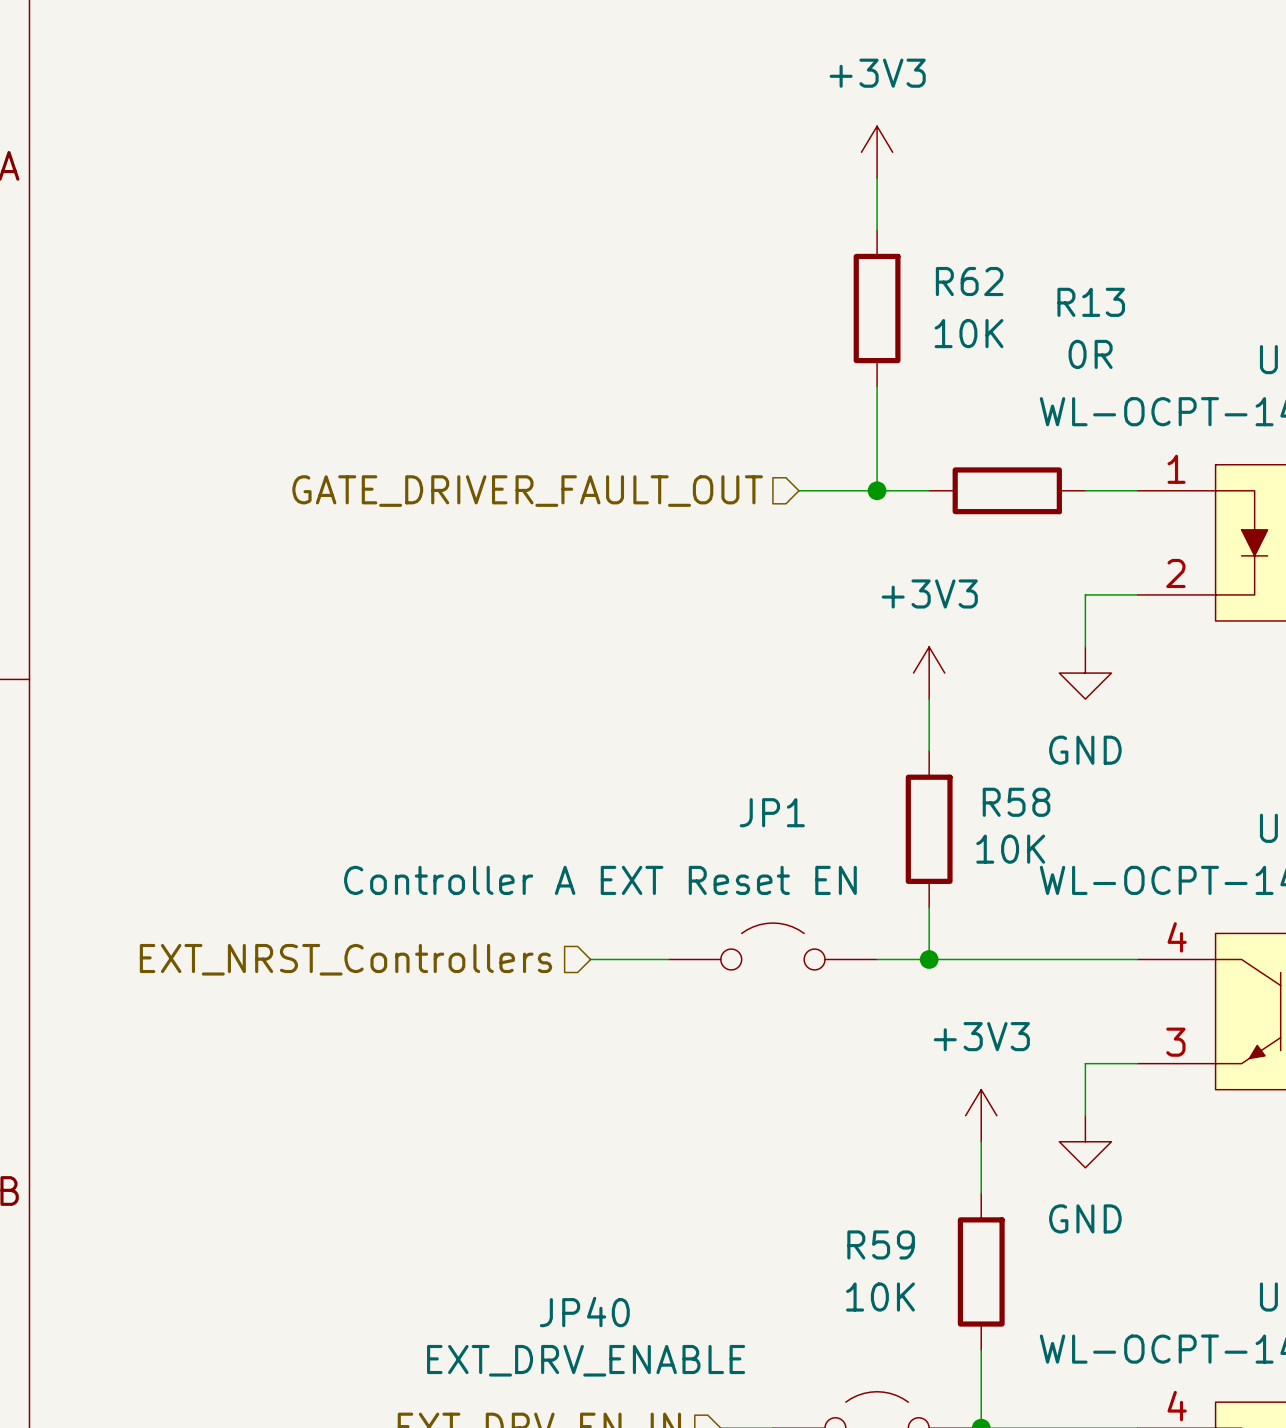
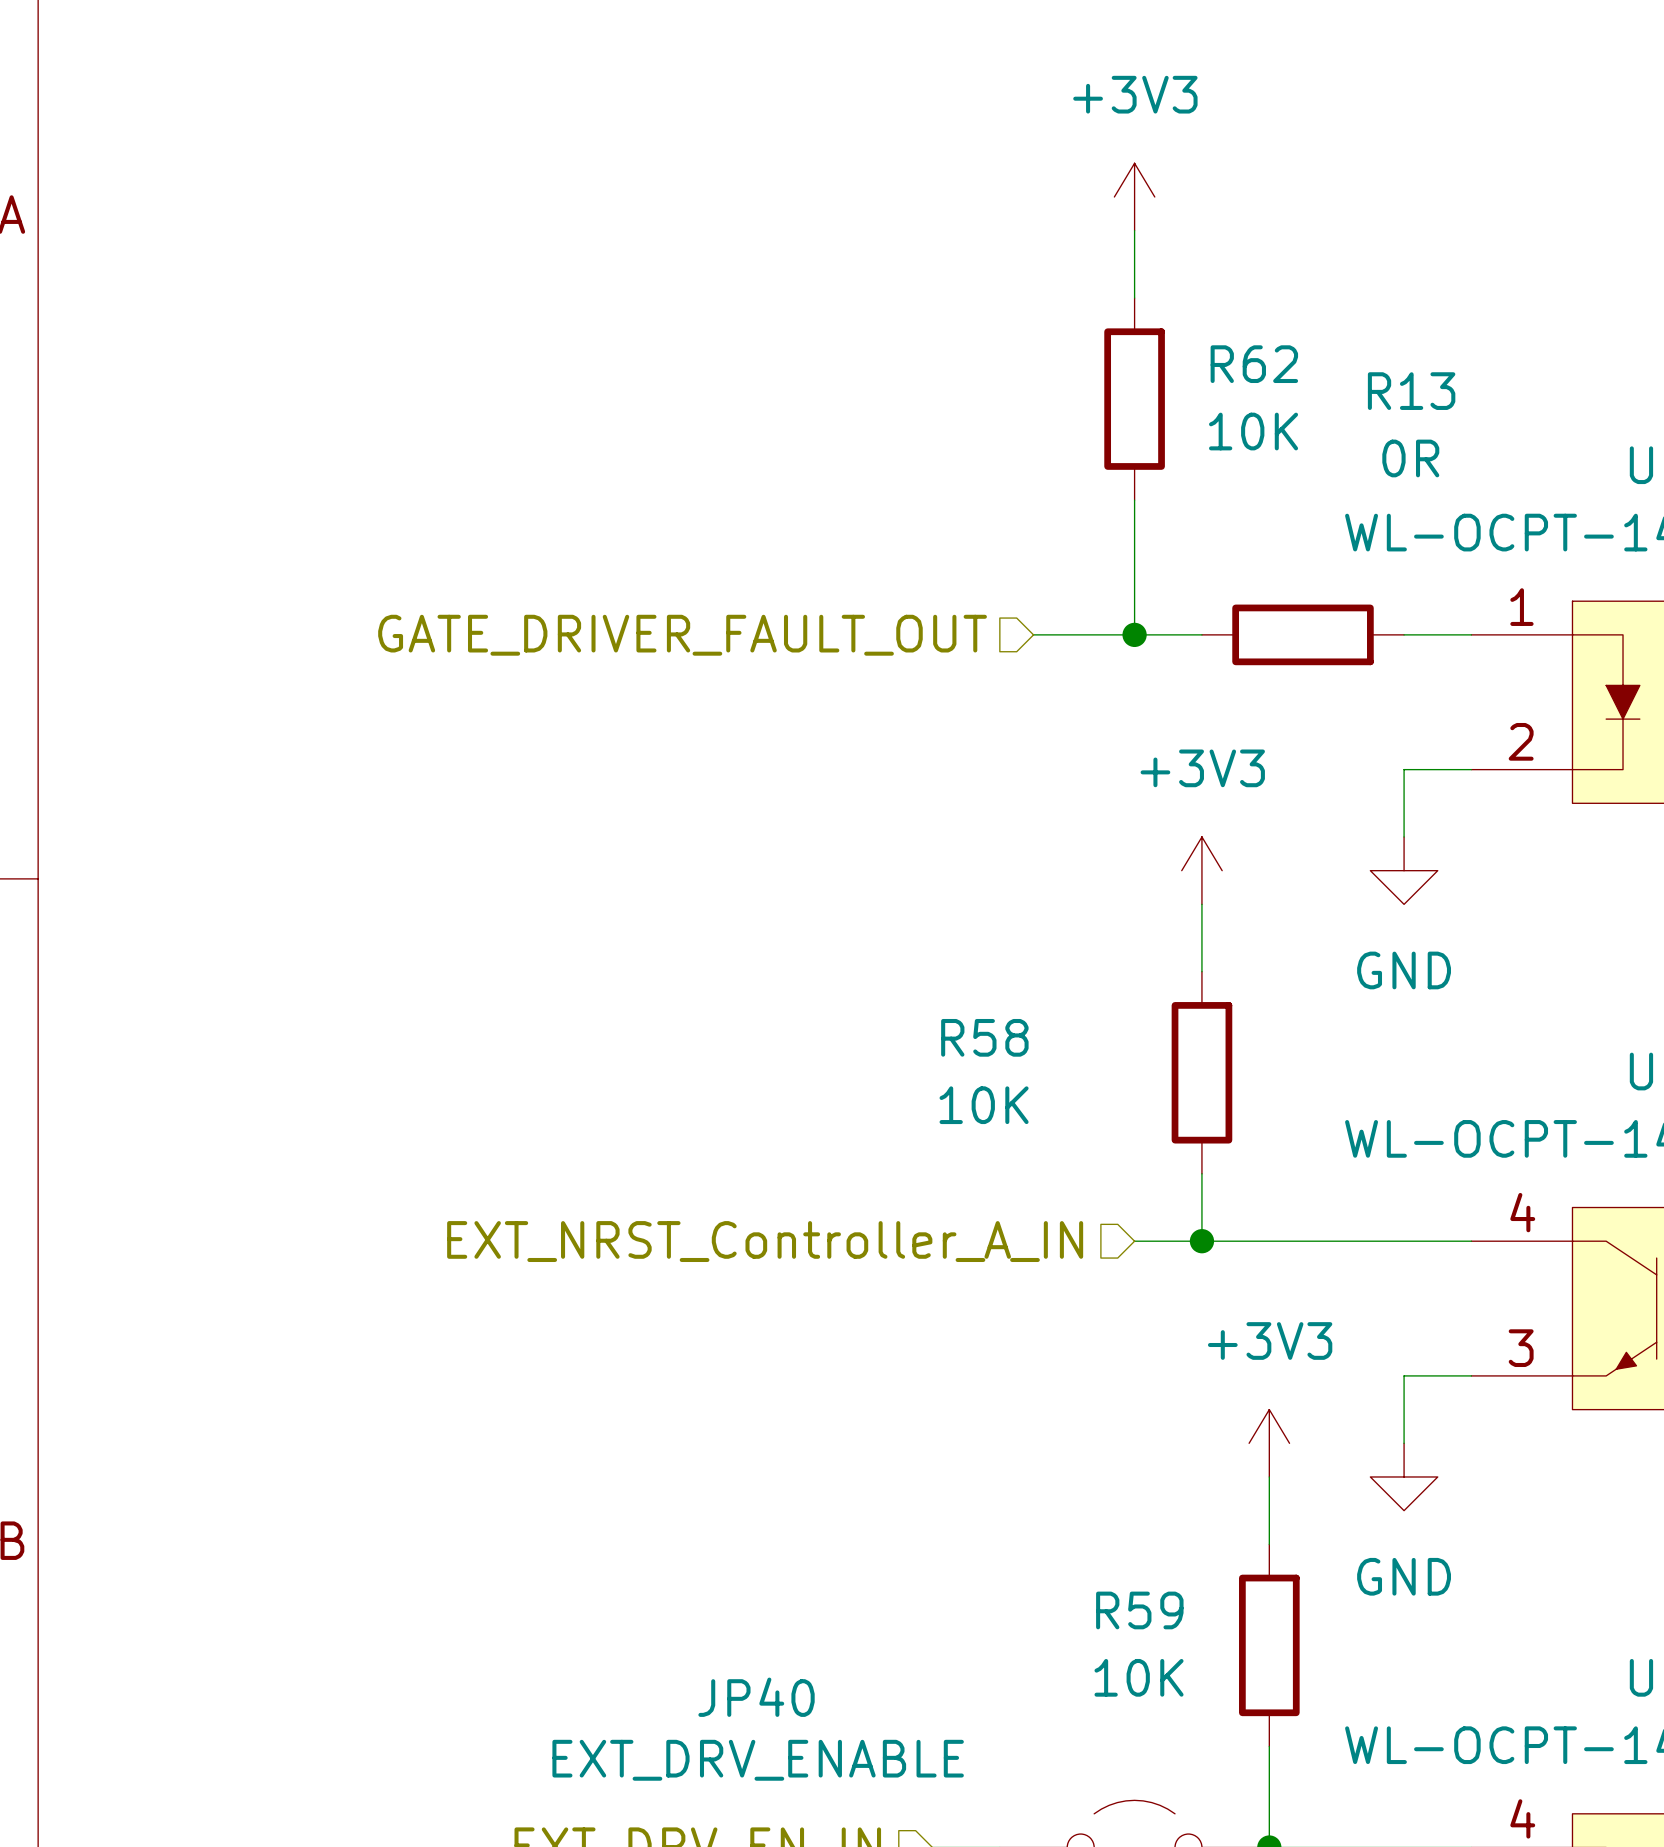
R58 name position: R58 (1016, 802) -> R58 (984, 1037)
R58 value position: 10K (1010, 849) -> 10K (984, 1105)
JP1: Controller A EXT Reset EN (772, 946) -> none
hierarchical label: EXT_NRST_Controllers (345, 959) -> EXT_NRST_Controller_A_IN (765, 1241)
wire: (590, 959) (668, 959) -> none

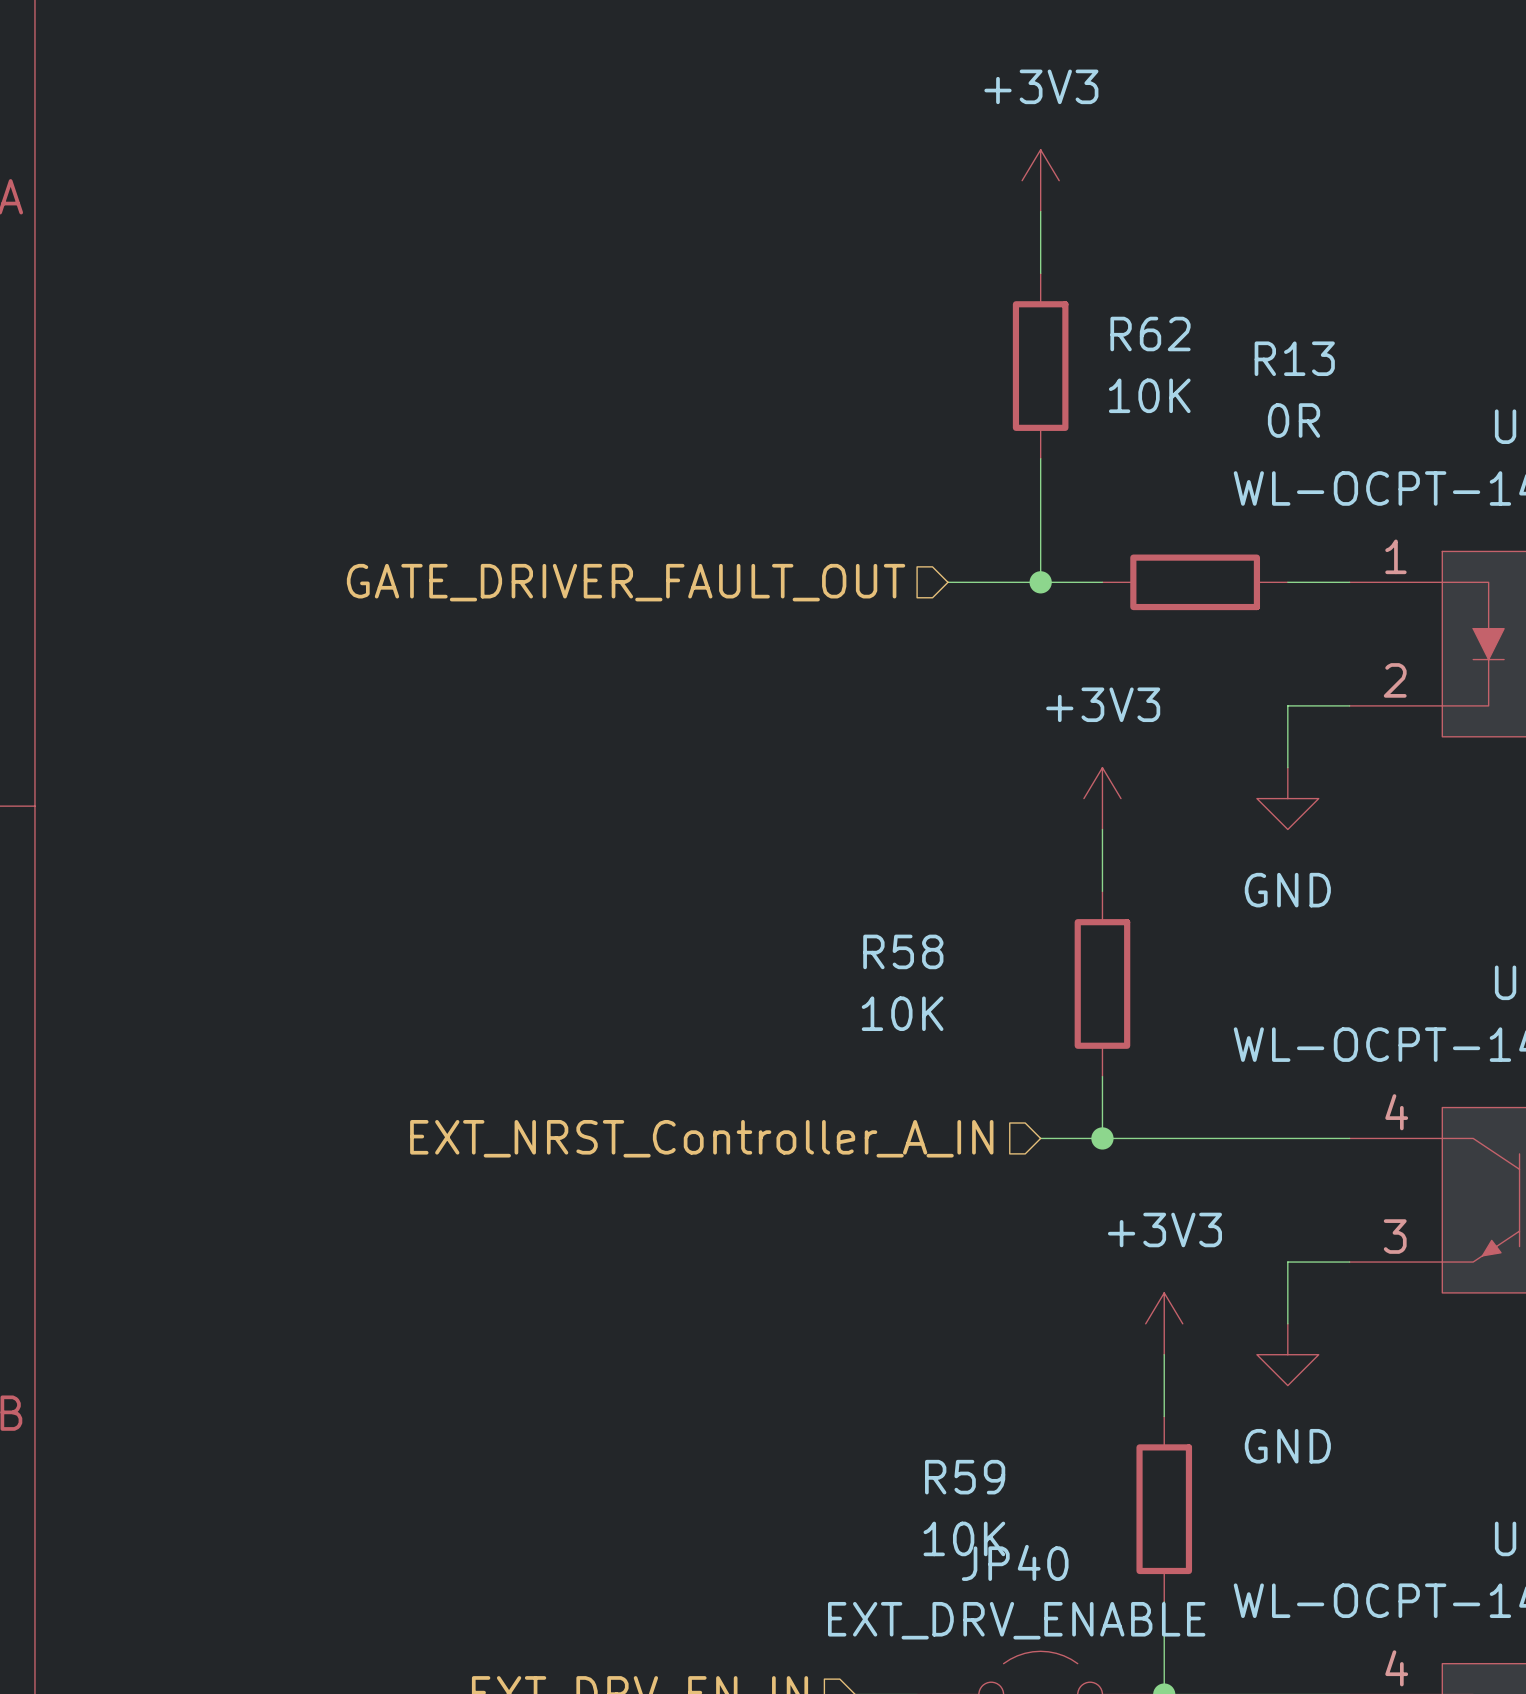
R59 name position: R59 (1139, 1610) -> R59 (965, 1477)
R59 value position: 10K (1139, 1677) -> 10K (964, 1538)
JP40 name position: JP40 (756, 1697) -> JP40 (1015, 1562)
JP40 value position: EXT_DRV_ENABLE (758, 1760) -> EXT_DRV_ENABLE (1016, 1620)

